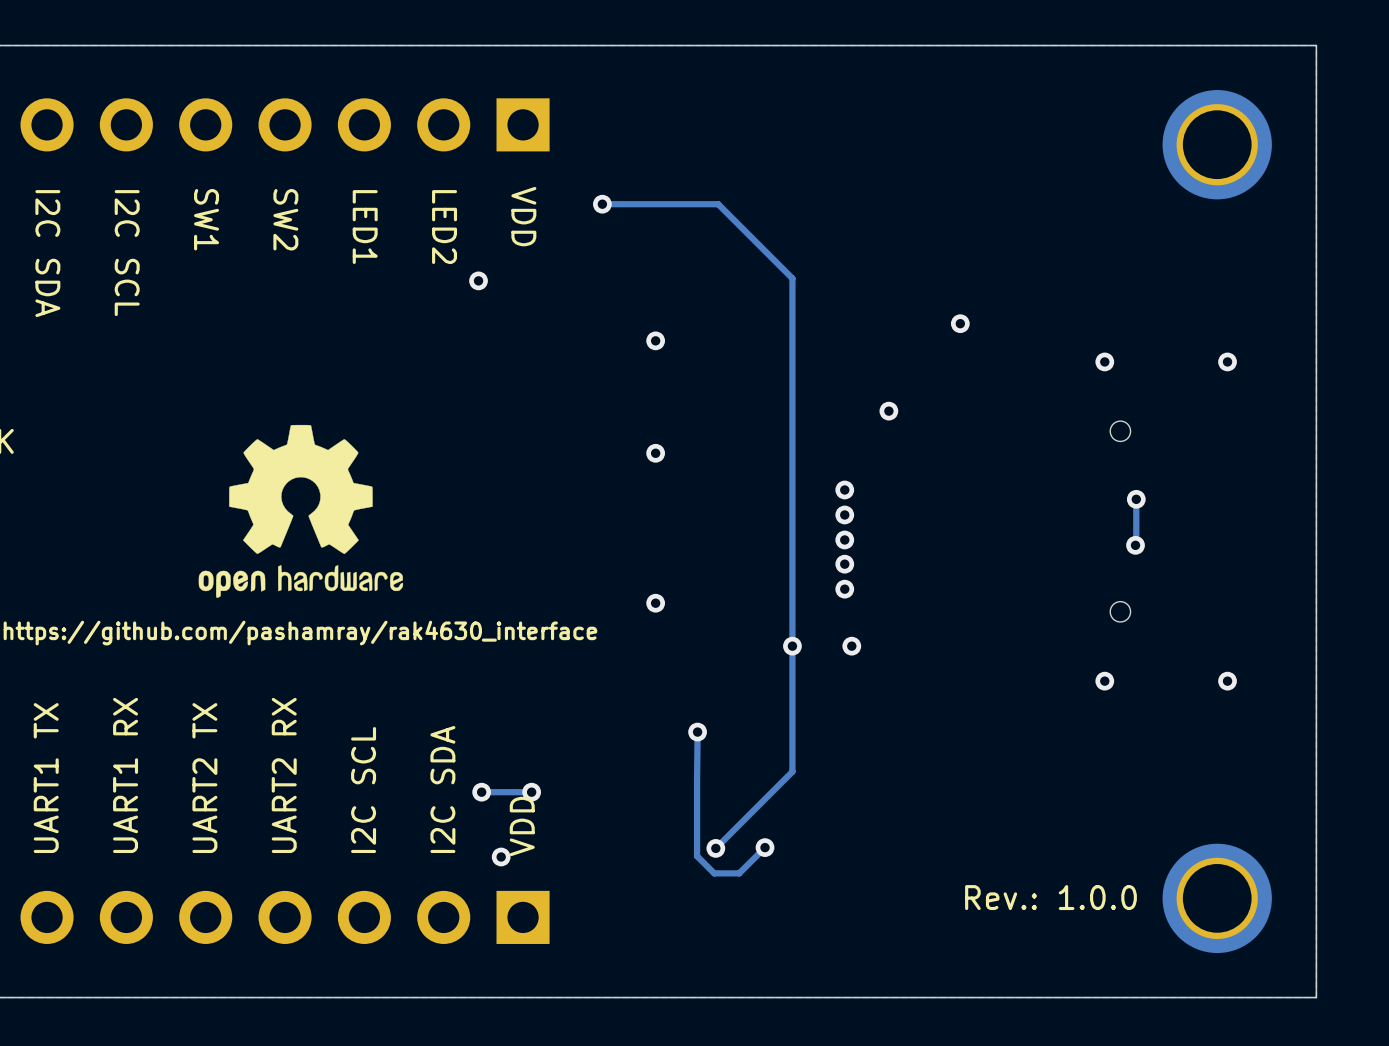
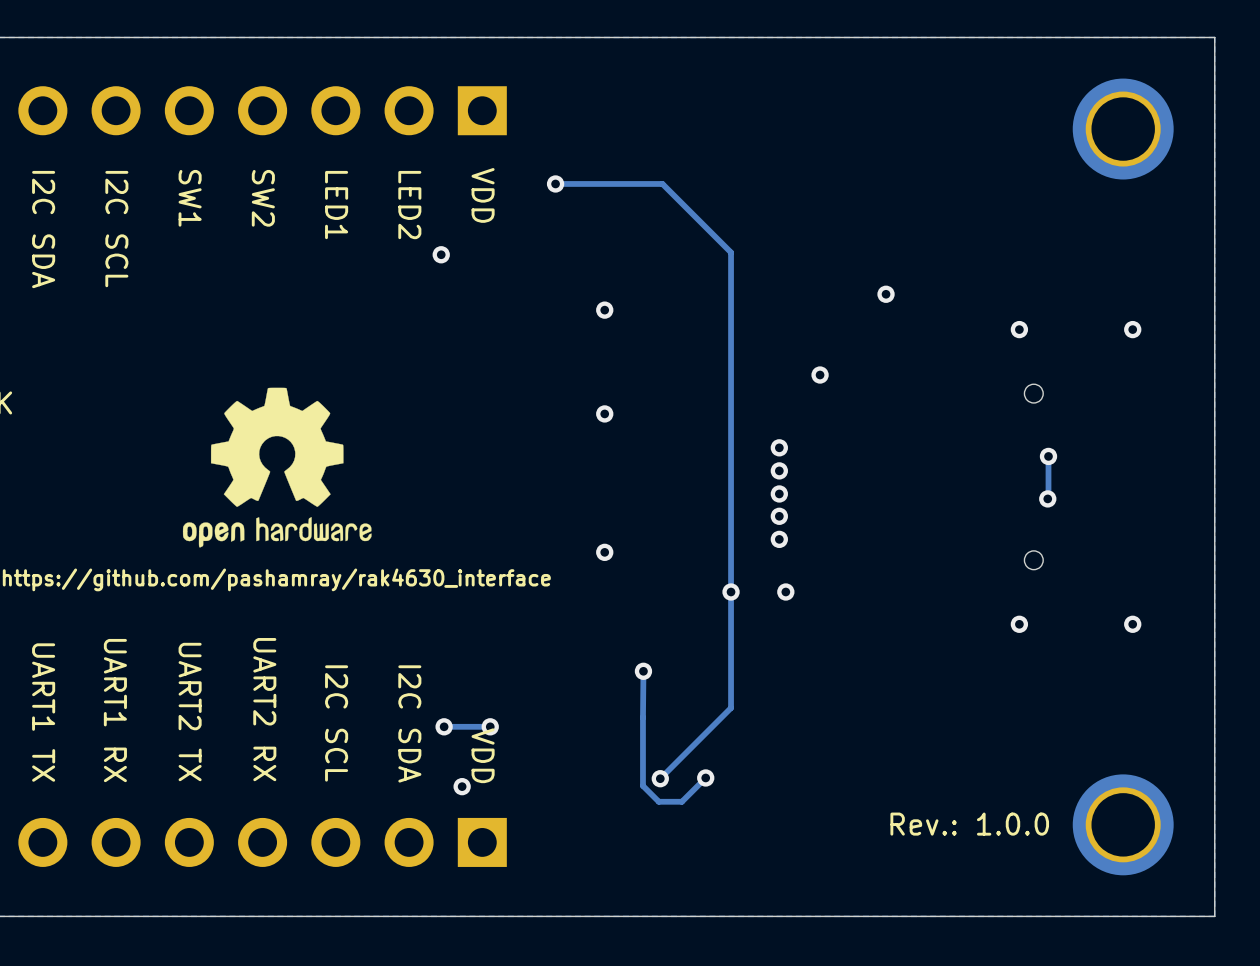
text rotation: 0° (125, 775) -> 180° (115, 710)
text rotation: 0° (284, 775) -> 180° (264, 709)
text rotation: 0° (46, 778) -> 180° (43, 712)
text rotation: 0° (204, 778) -> 180° (190, 712)
text rotation: 0° (442, 789) -> 180° (409, 723)
text rotation: 0° (363, 790) -> 180° (336, 723)
text rotation: 0° (522, 826) -> 180° (483, 755)

